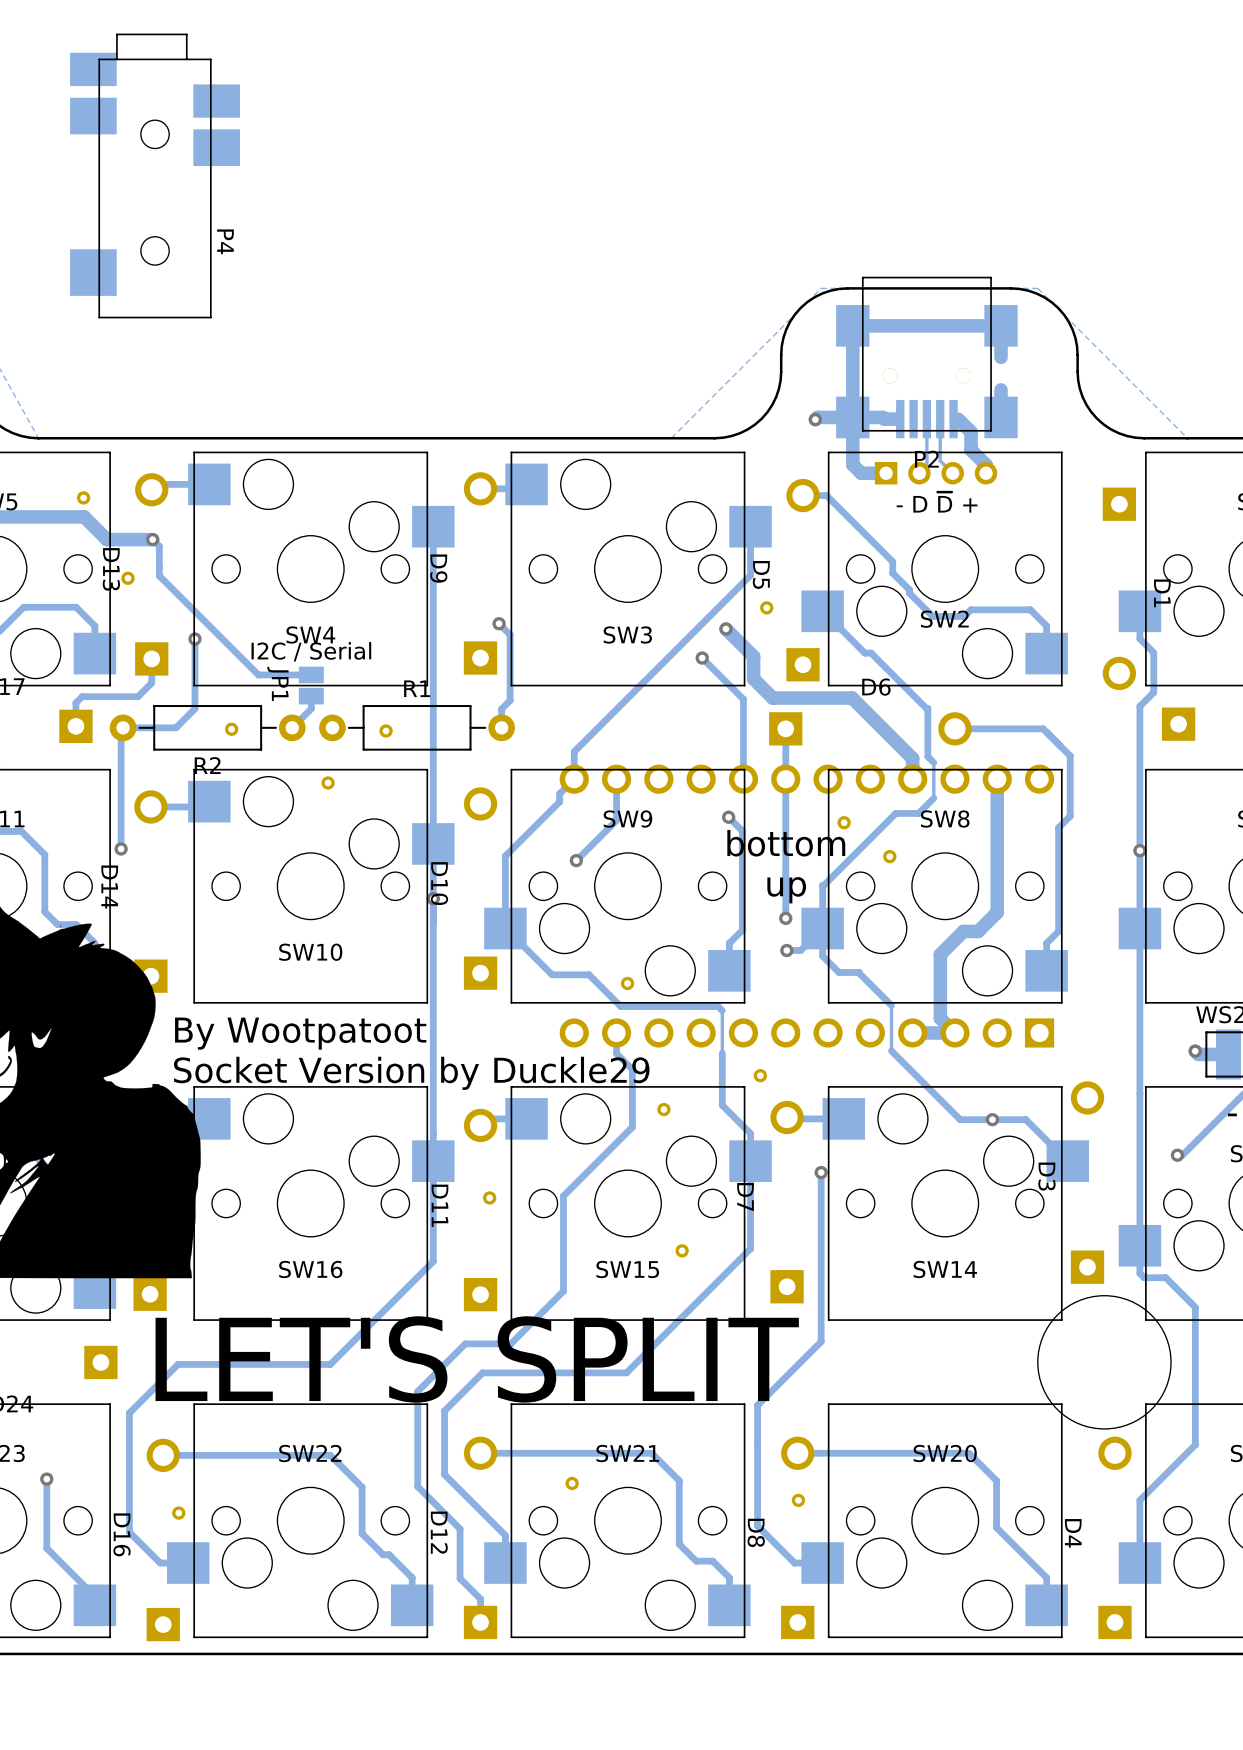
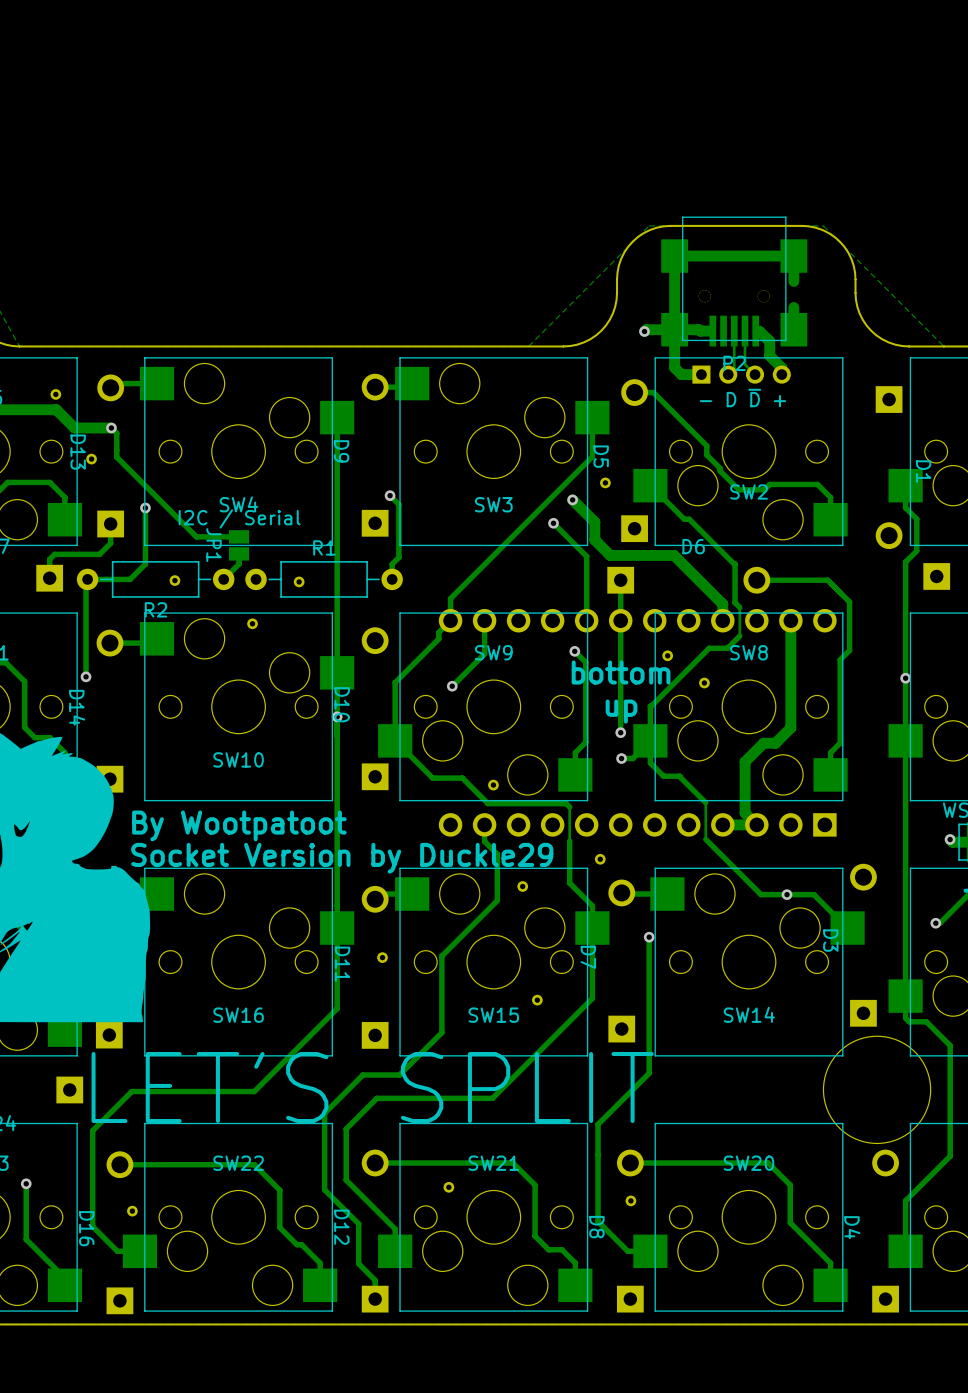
P4: (155, 175) -> none

